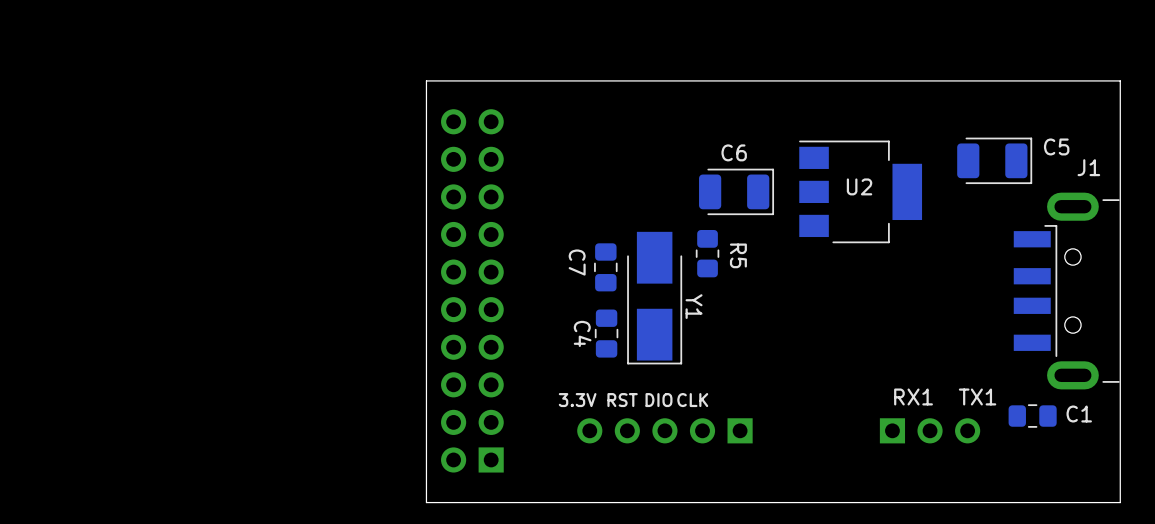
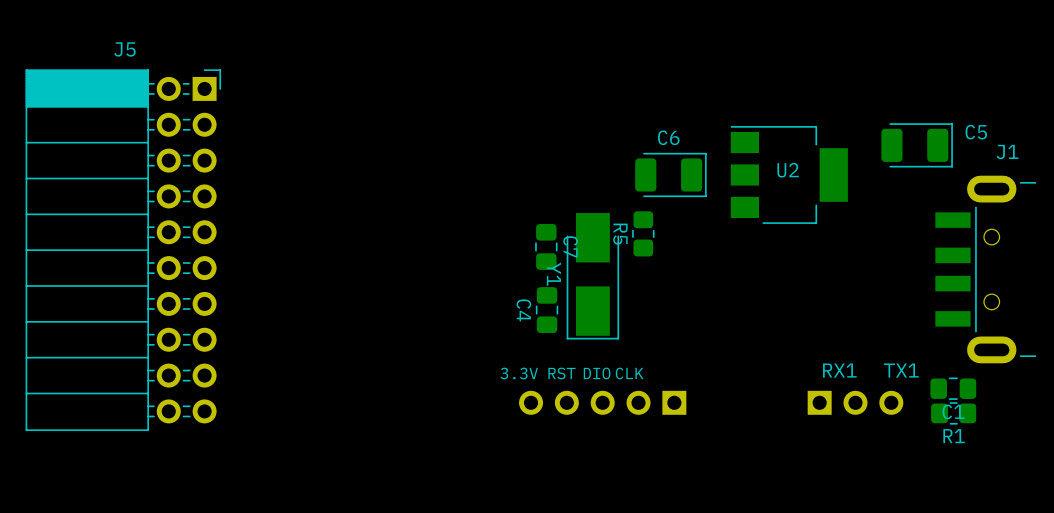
board edge: (1120, 80) (426, 80) (426, 502) (1120, 502) (1120, 80) -> none
J1 footprint: [1013, 192, 1120, 390] -> [935, 175, 1037, 364]
R5 name position: R5 (738, 255) -> R5 (620, 234)
C7 name position: C7 (577, 262) -> C7 (570, 246)
J5 side: top (472, 290) -> bottom (123, 250)
Y1 name position: Y1 (694, 306) -> Y1 (553, 274)
C1 name position: C1 (1079, 413) -> C1 (953, 411)
R1: none -> (953, 413)

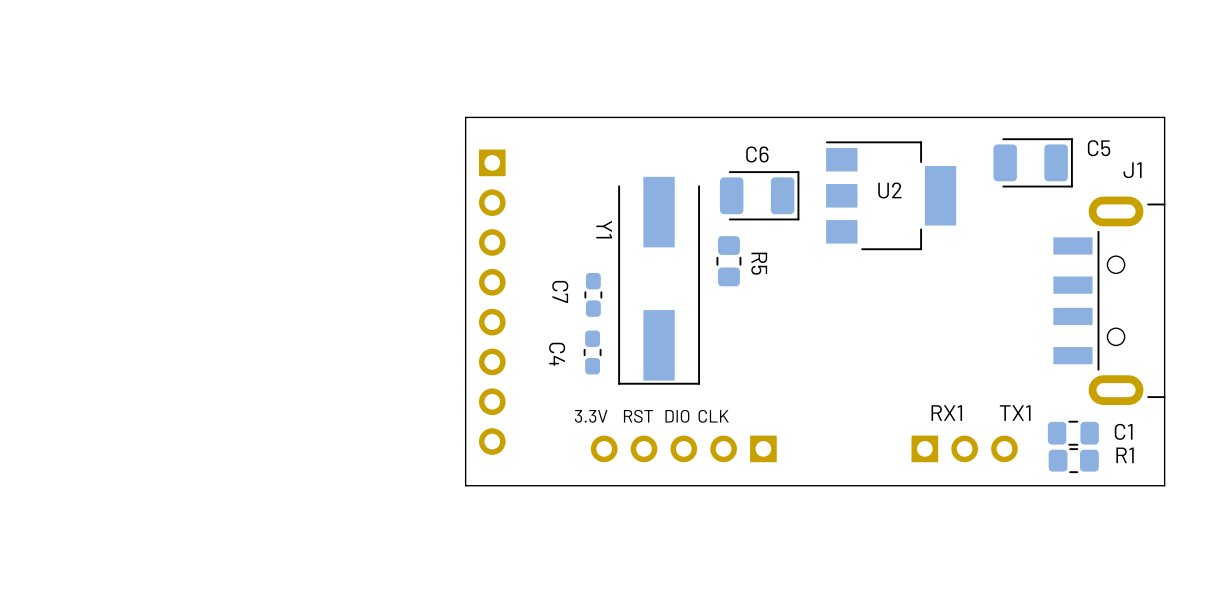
board edge: none -> (1164, 117) (1164, 485) (465, 485) (465, 117) (1164, 117)
Y1 footprint: [566, 213, 620, 340] -> [618, 176, 700, 385]
C7 footprint: [535, 224, 558, 270] -> [584, 272, 603, 317]
R5 name position: R5 (620, 234) -> R5 (759, 263)
C7 name position: C7 (570, 246) -> C7 (560, 291)
J5: (123, 250) -> none
part: none -> (492, 302)
Y1 name position: Y1 (553, 274) -> Y1 (604, 229)
C4 footprint: [535, 287, 559, 333] -> [583, 330, 602, 375]
C1 name position: C1 (953, 411) -> C1 (1123, 431)
R1 name position: R1 (954, 436) -> R1 (1125, 455)

